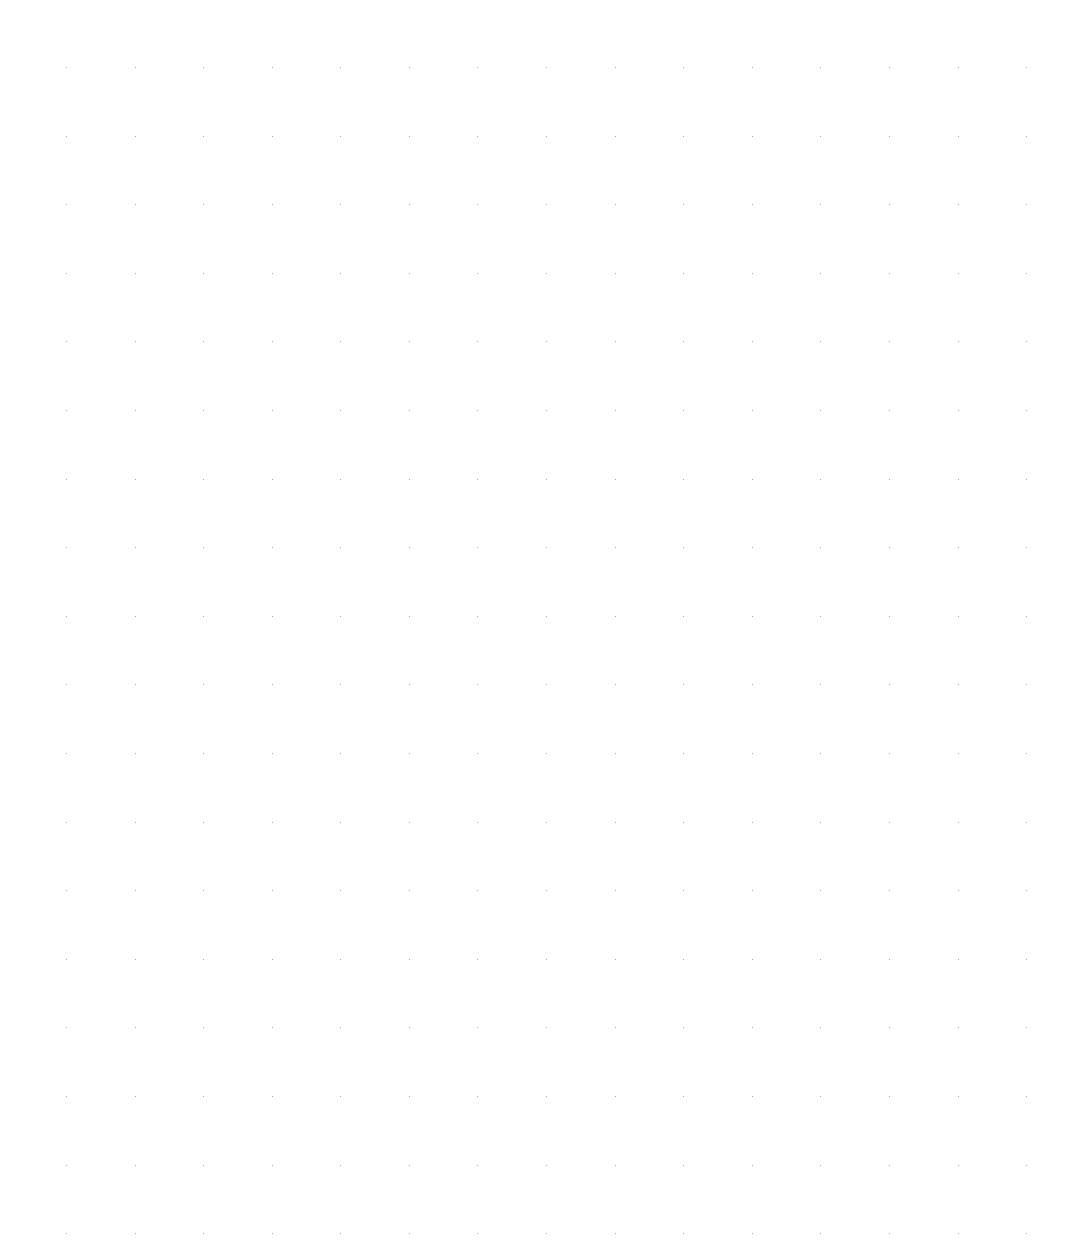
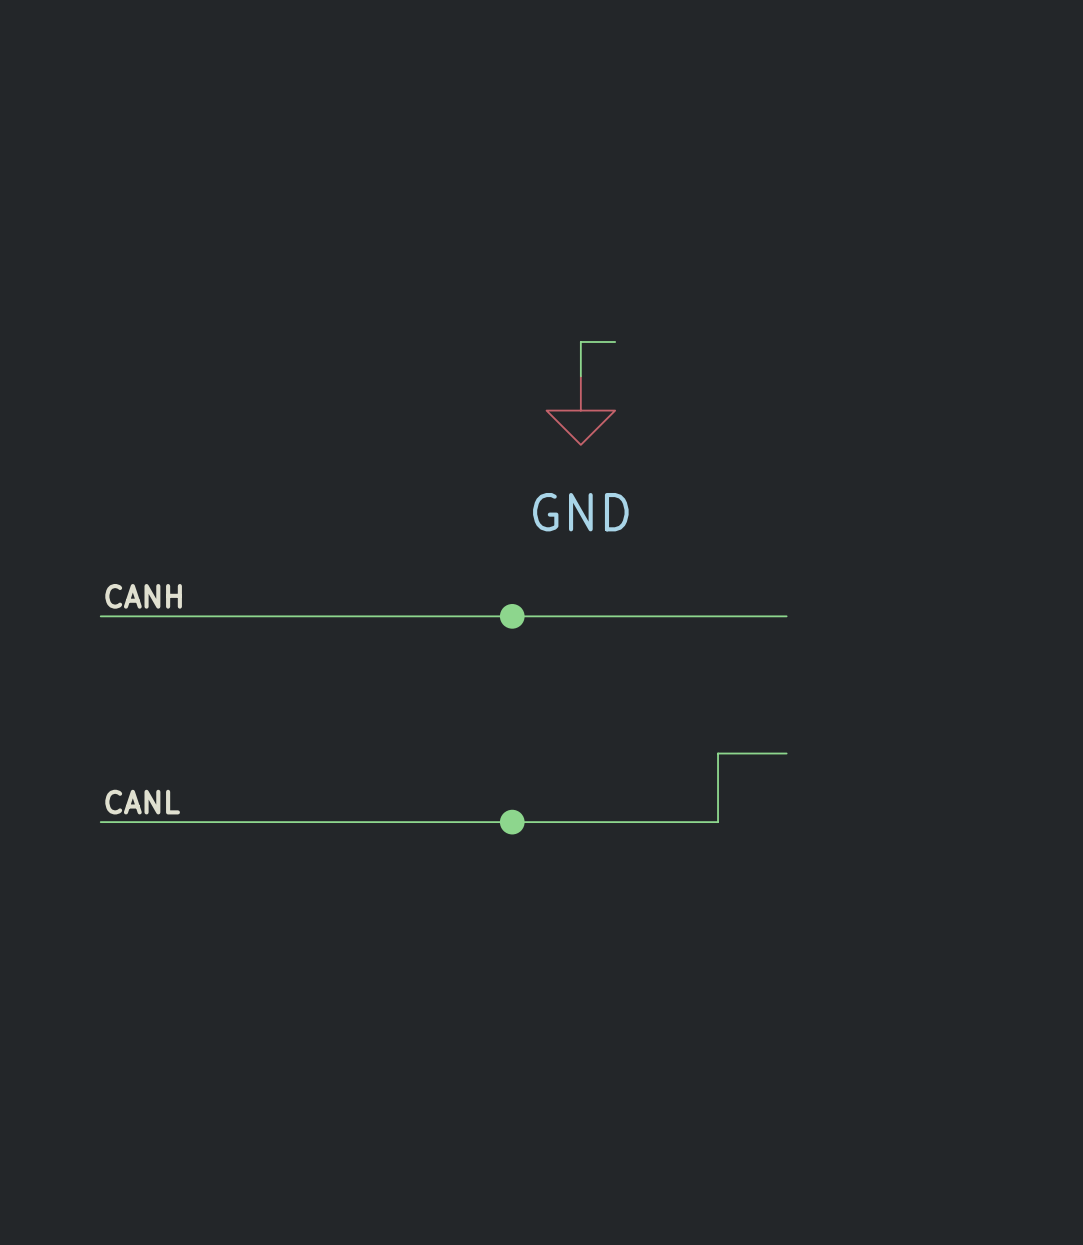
wire: none -> (615, 341) (580, 341) (580, 376)
power symbol: none -> GND (580, 410)
label: none -> CANH (143, 596)
wire: none -> (100, 616) (786, 616)
junction: none -> (512, 616)
wire: none -> (786, 753) (718, 753) (718, 822) (100, 822)
label: none -> CANL (142, 802)
junction: none -> (512, 822)

